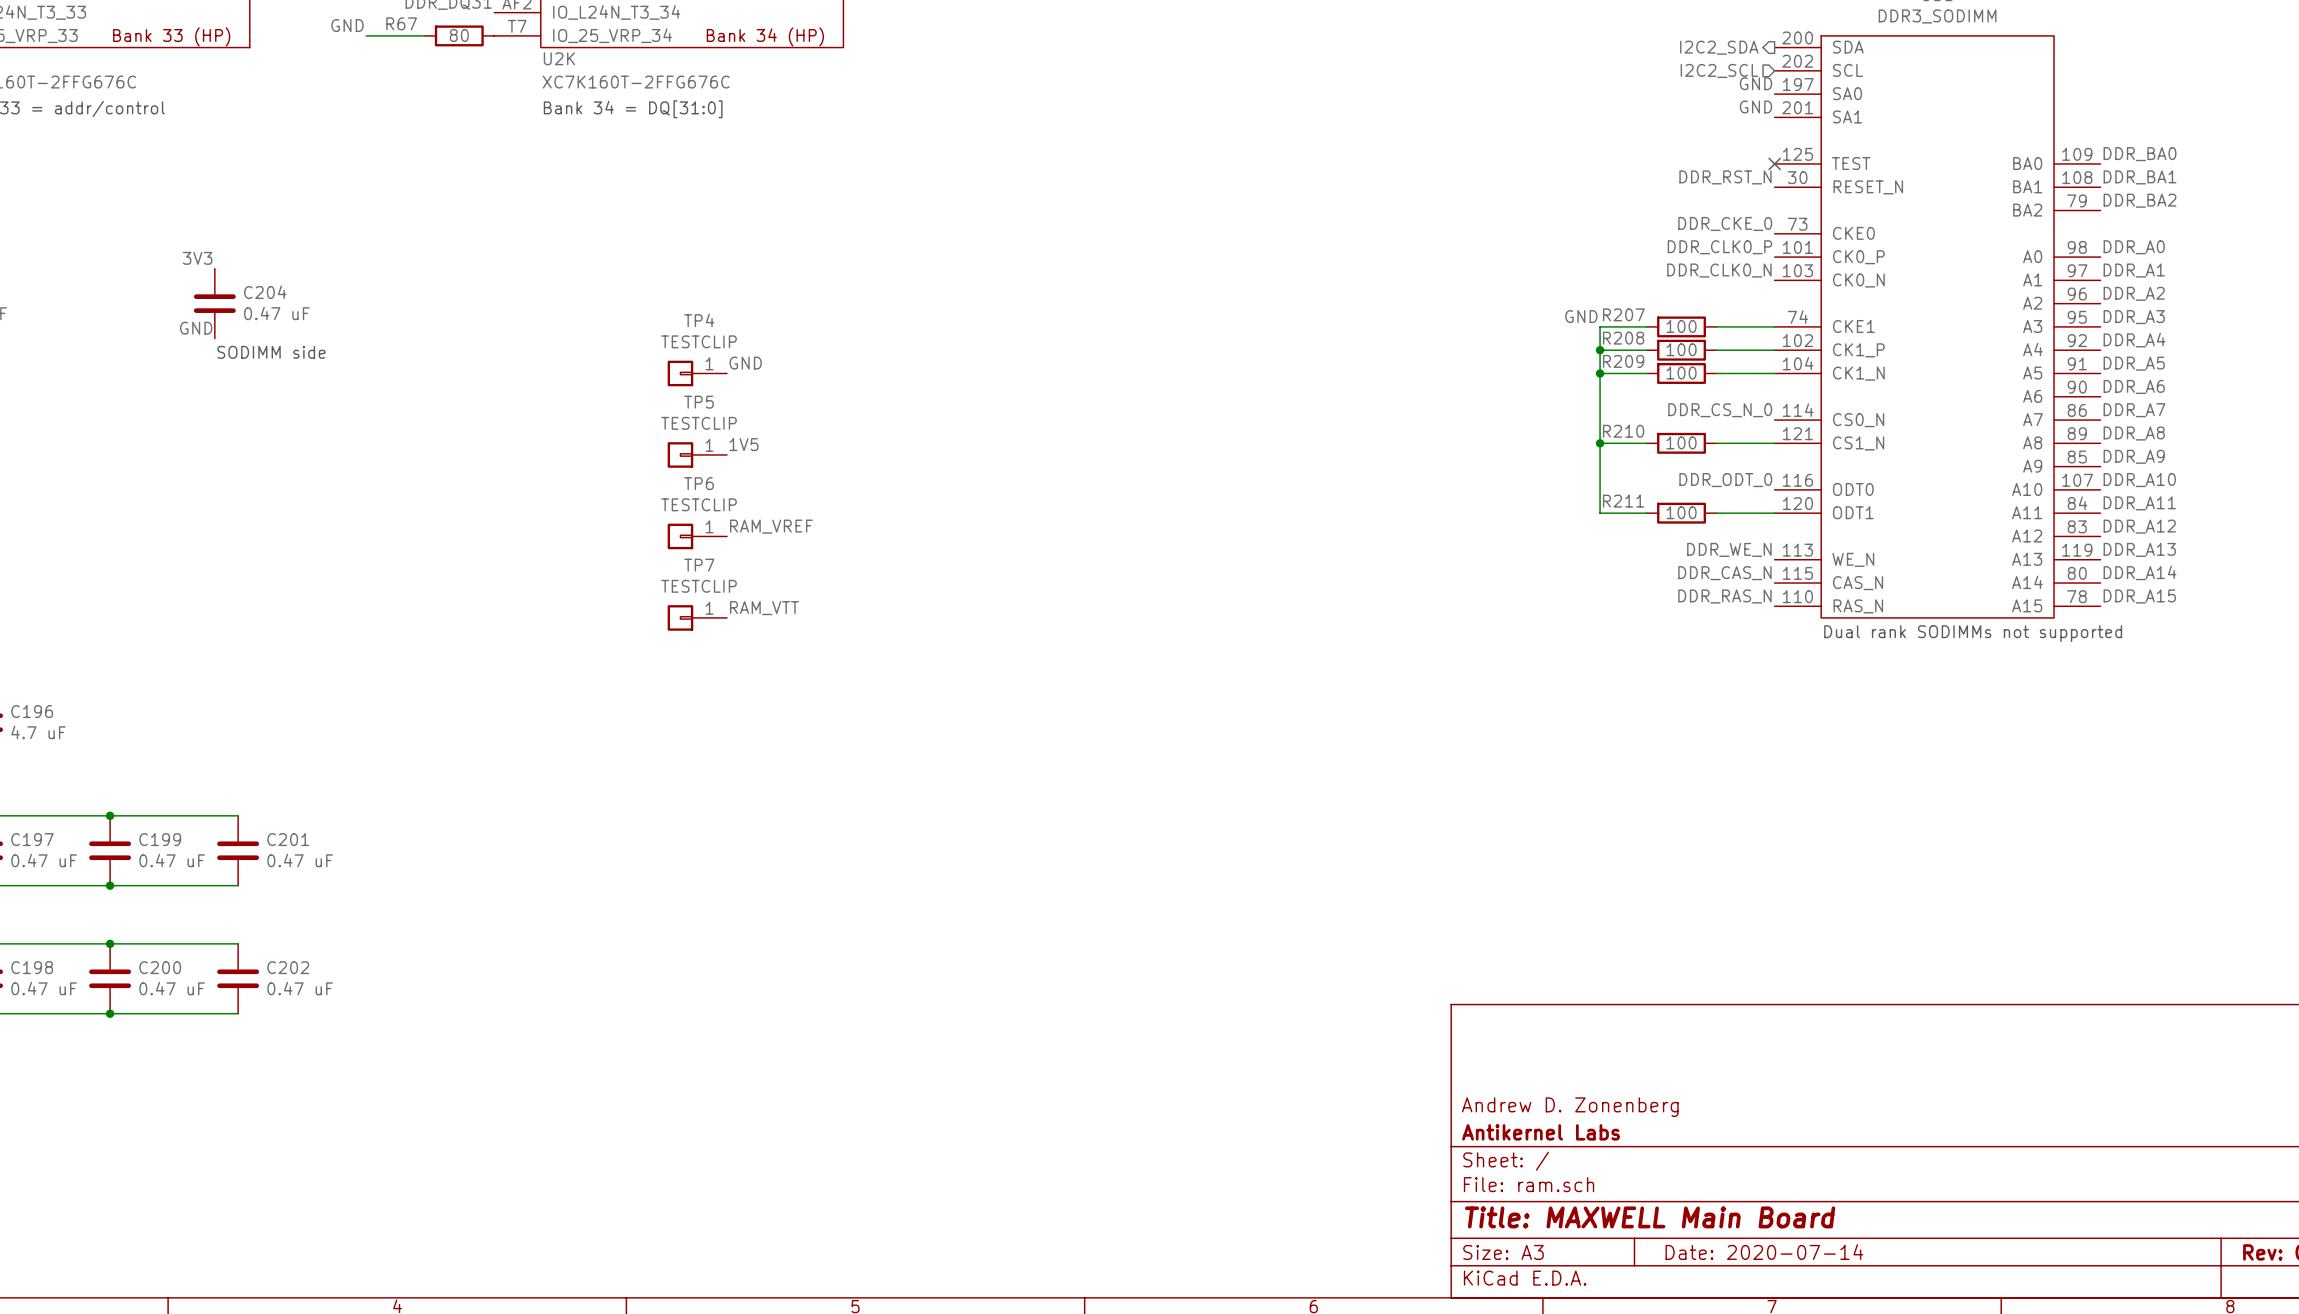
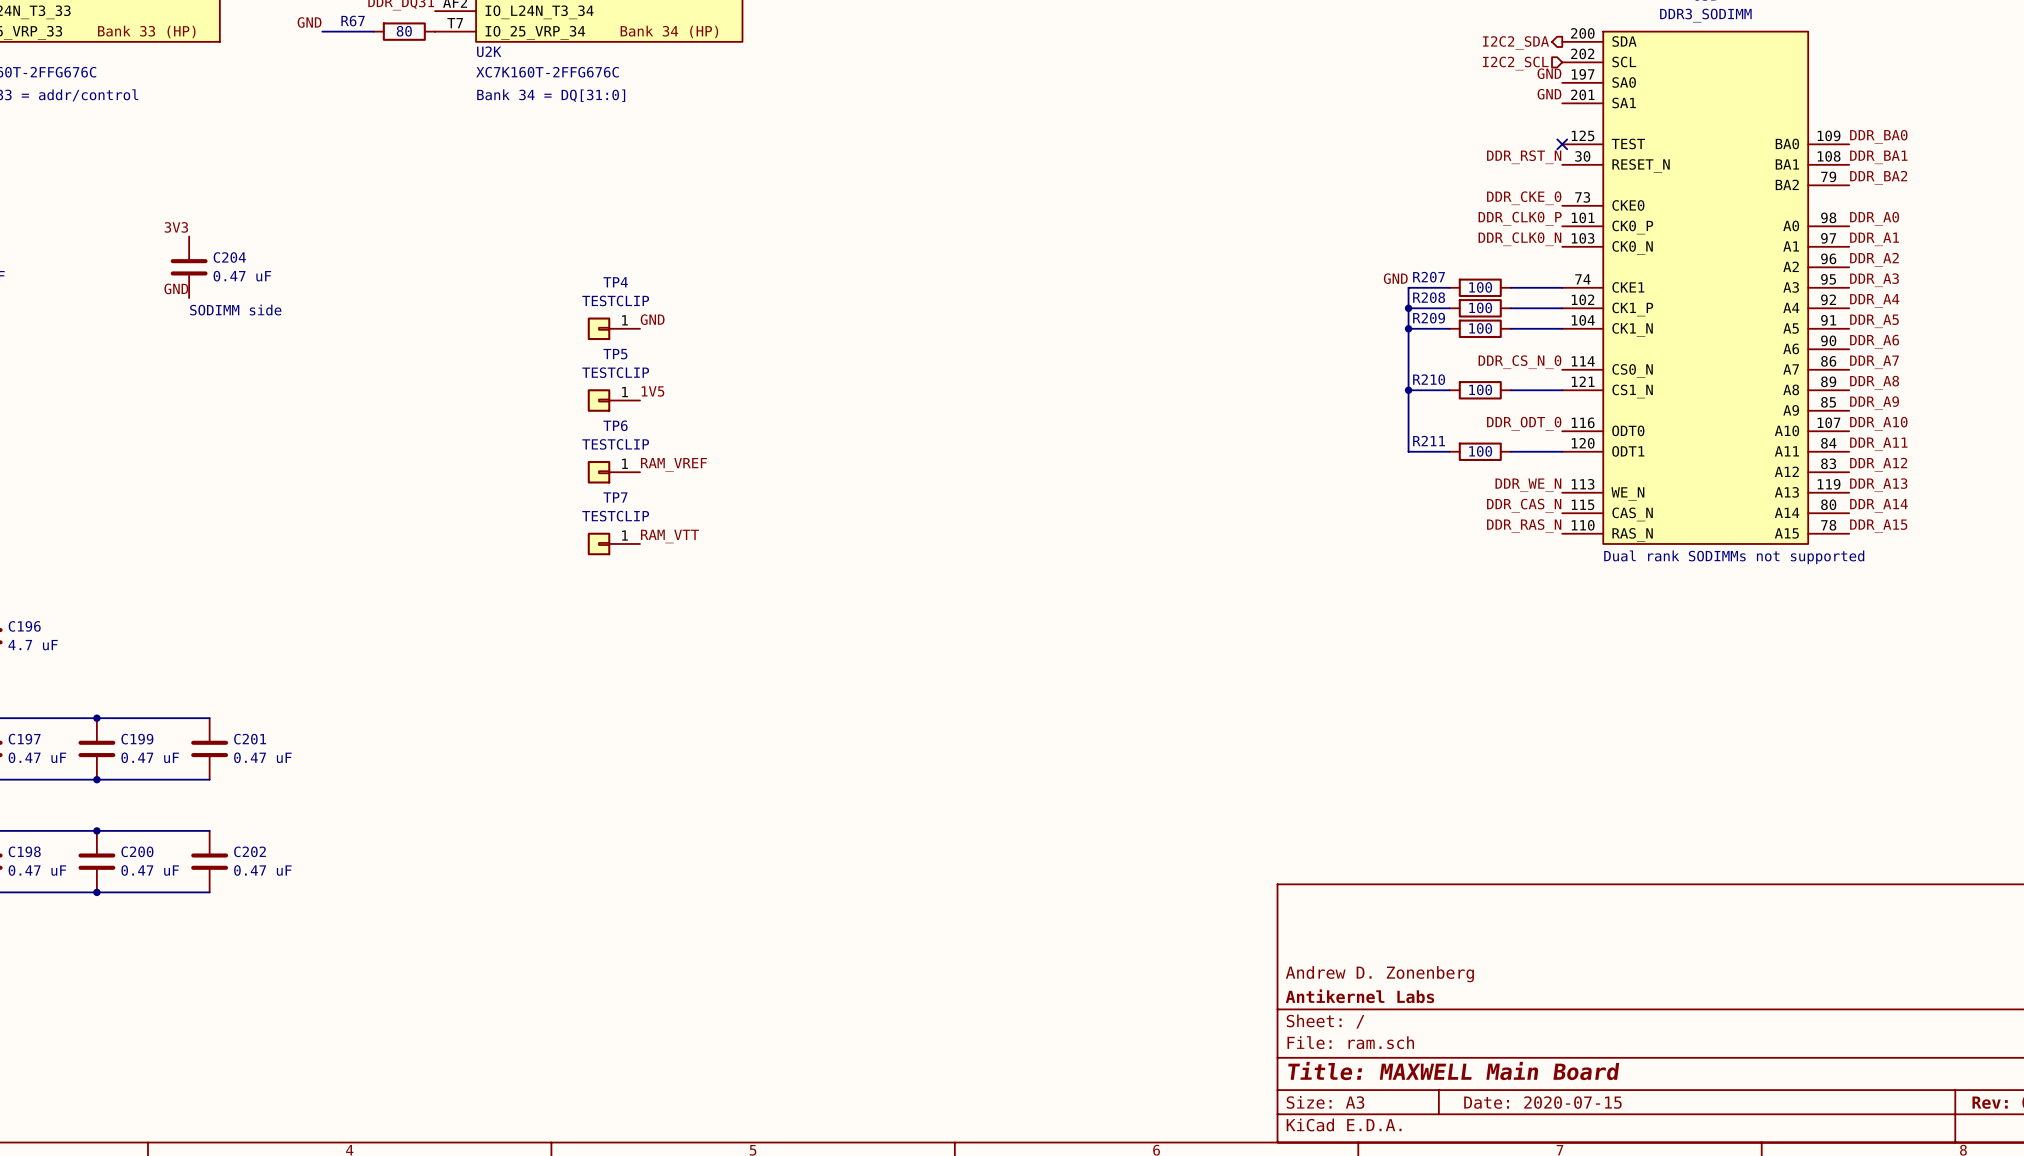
title block: Date: 2020-07-14 (1764, 1252) -> Date: 2020-07-15 (1542, 1102)

